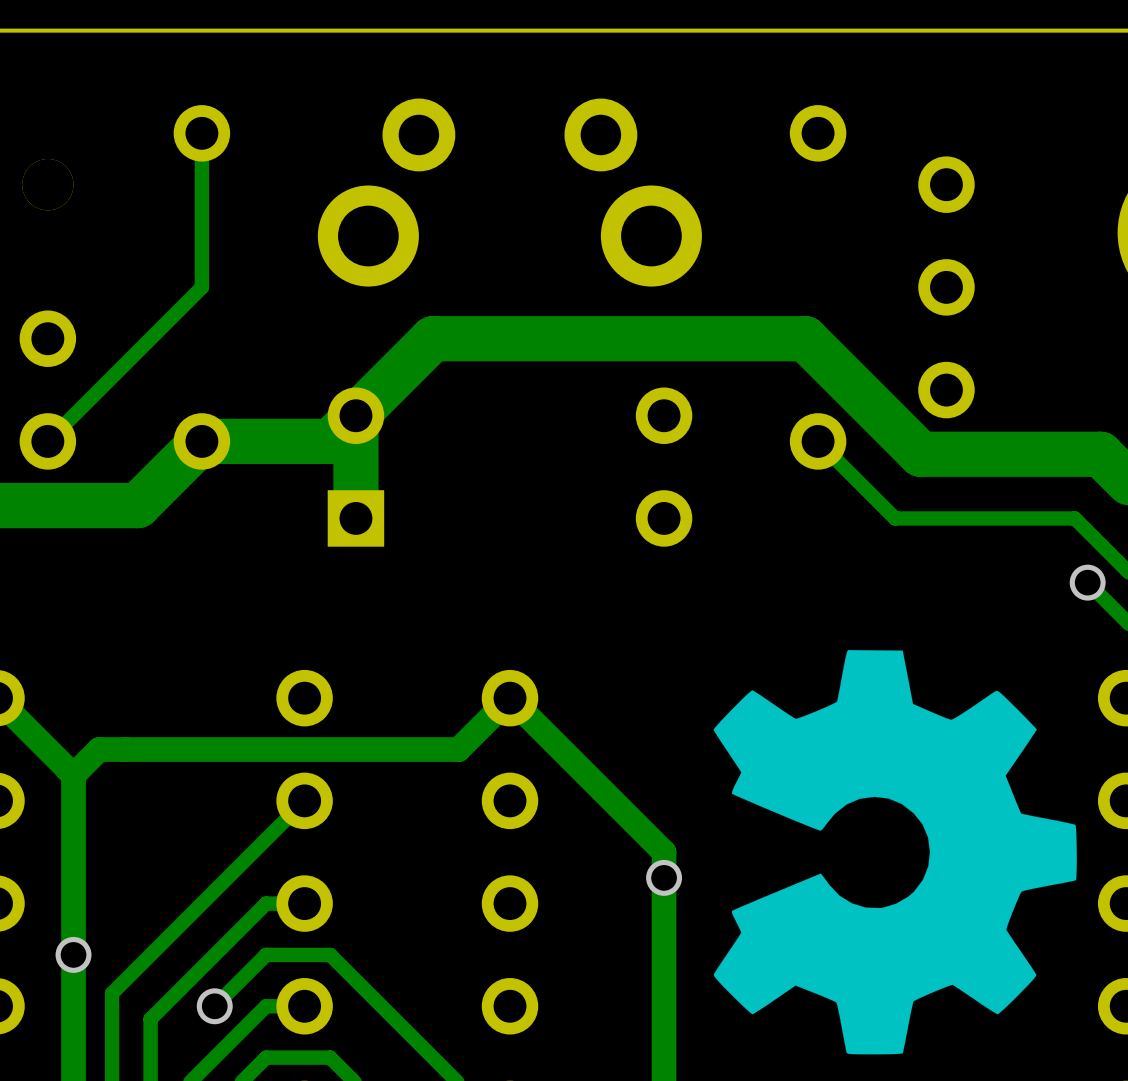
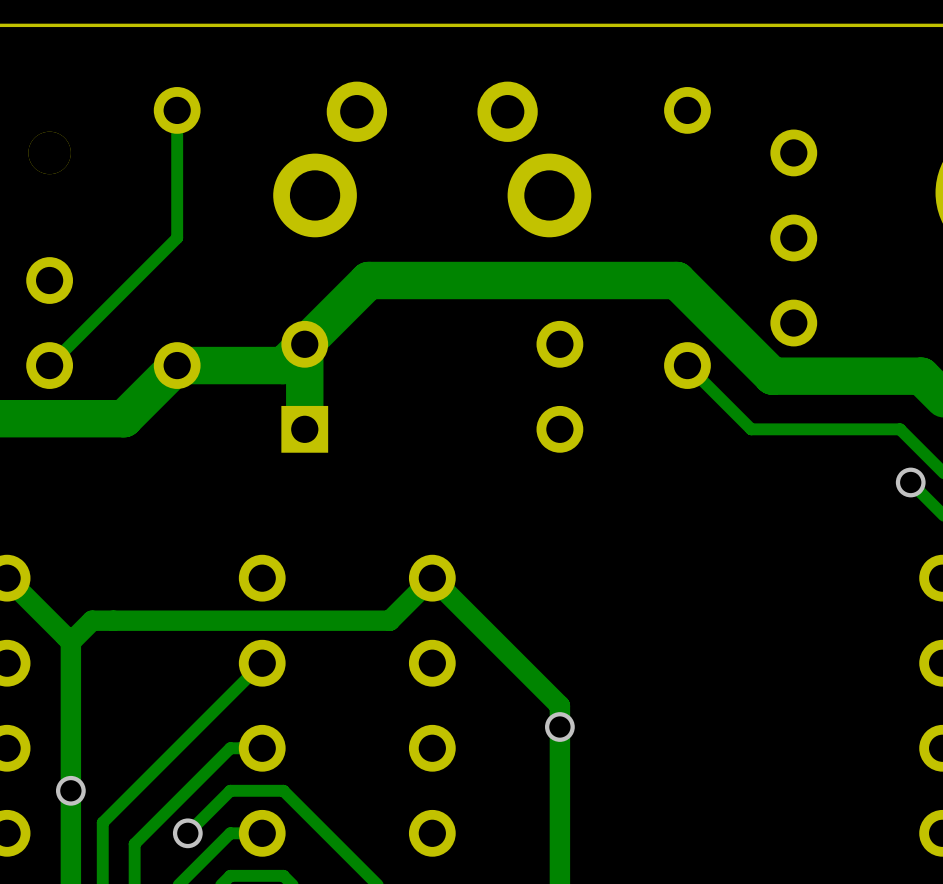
drawing: [713, 650, 1077, 1055] -> none

